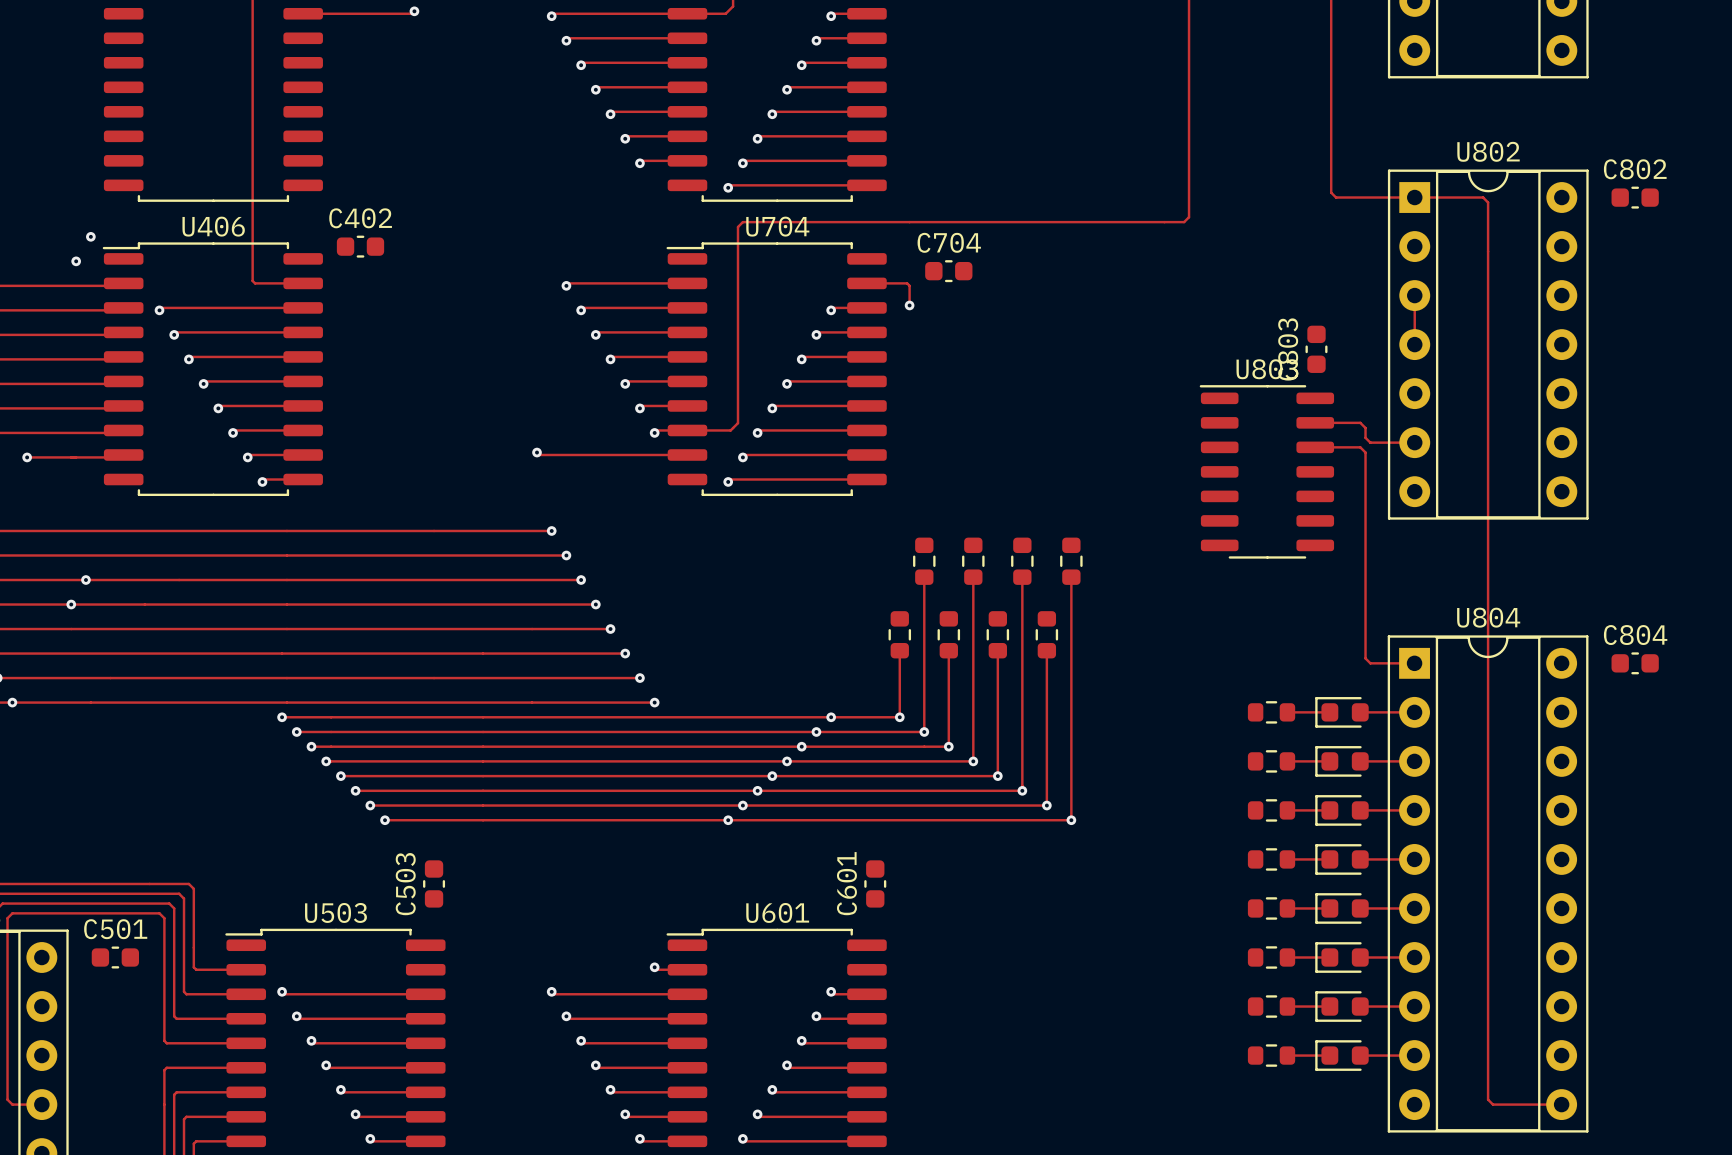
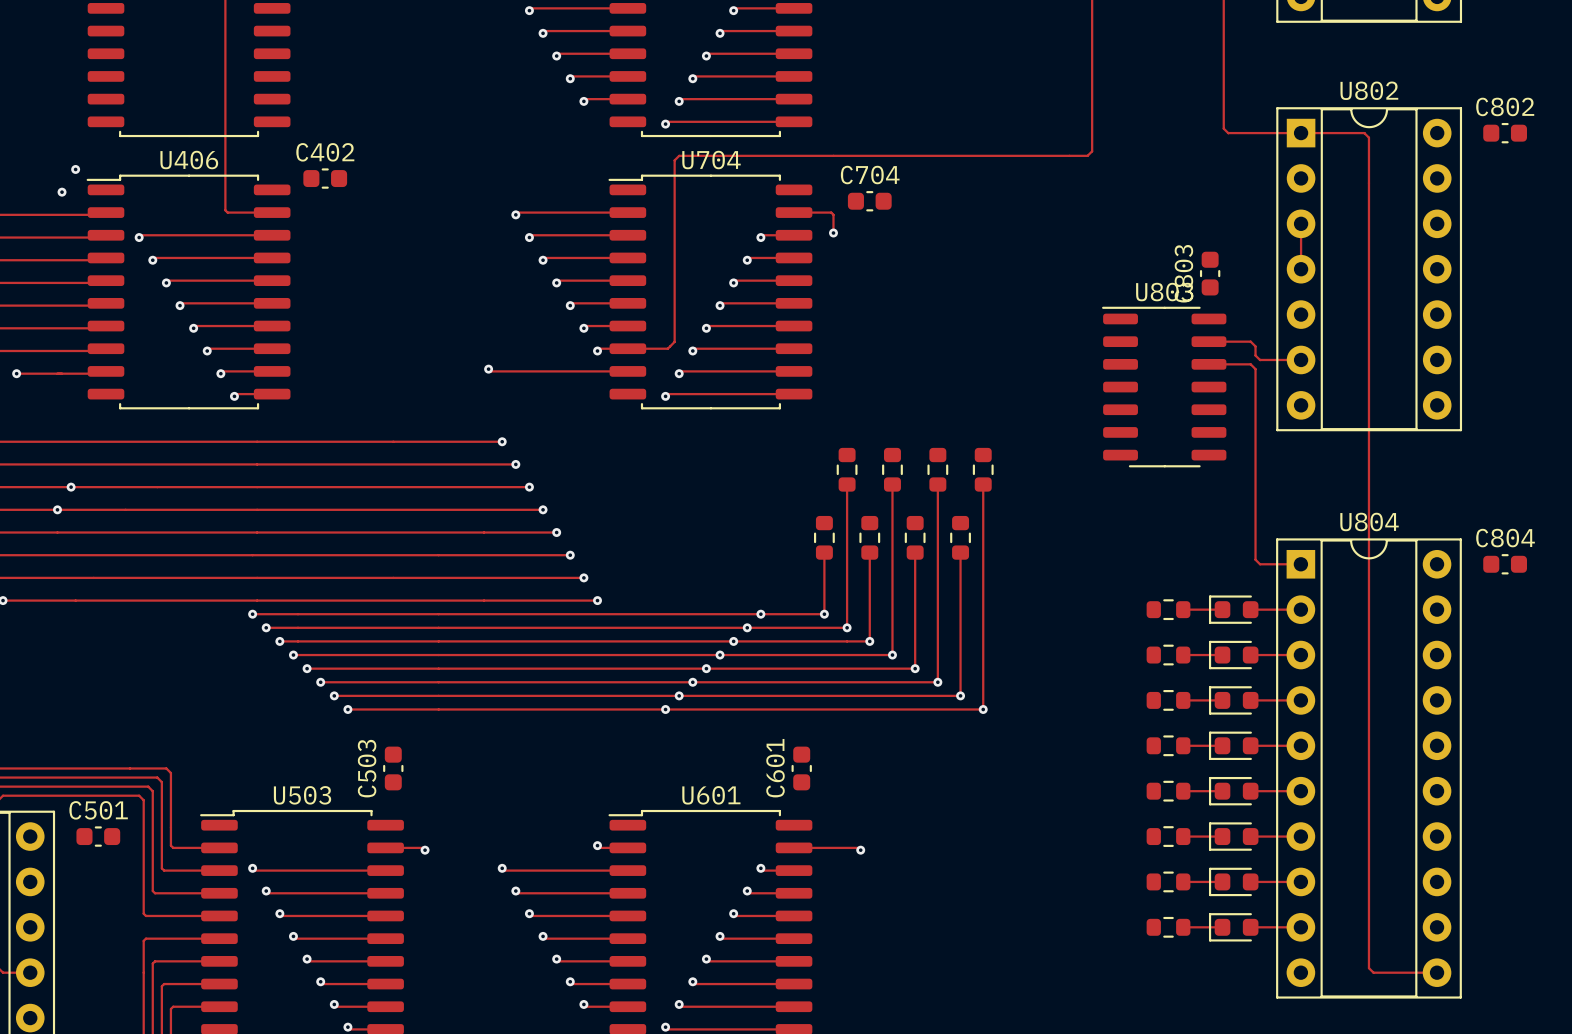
track: none -> (385, 847) (422, 847) (425, 850)
track: none -> (794, 847) (858, 847) (860, 850)
via: none -> (425, 850)
via: none -> (860, 850)

